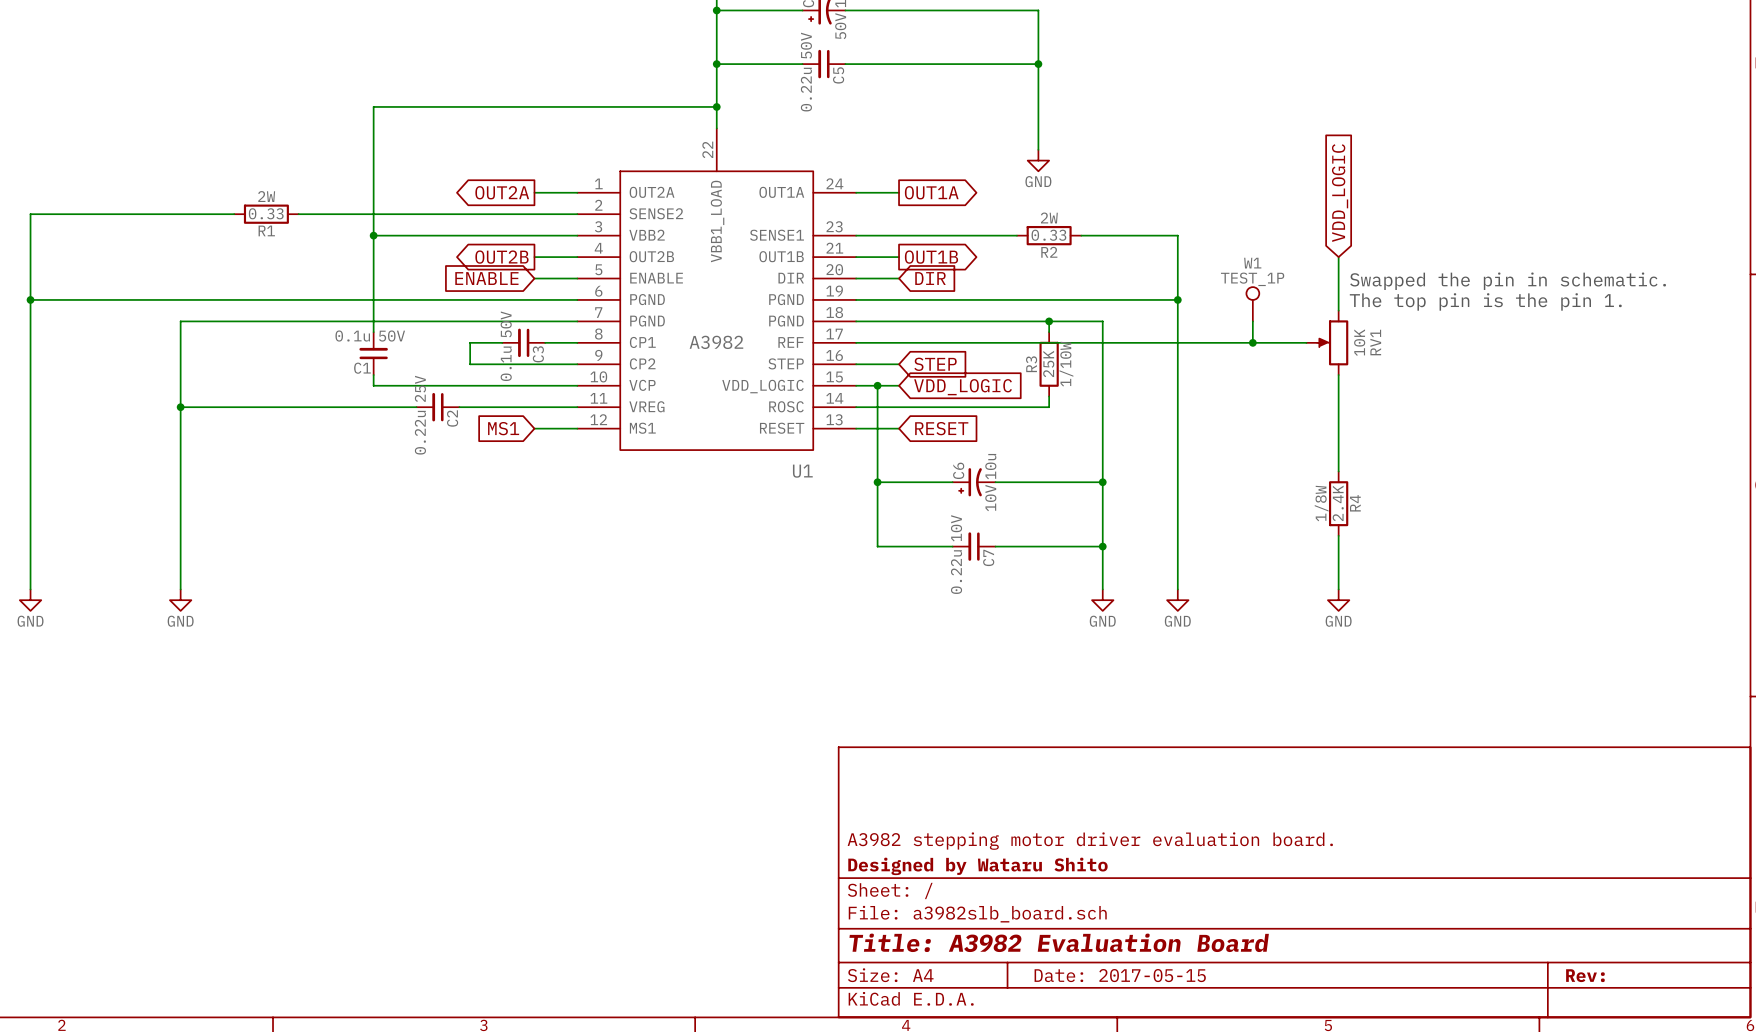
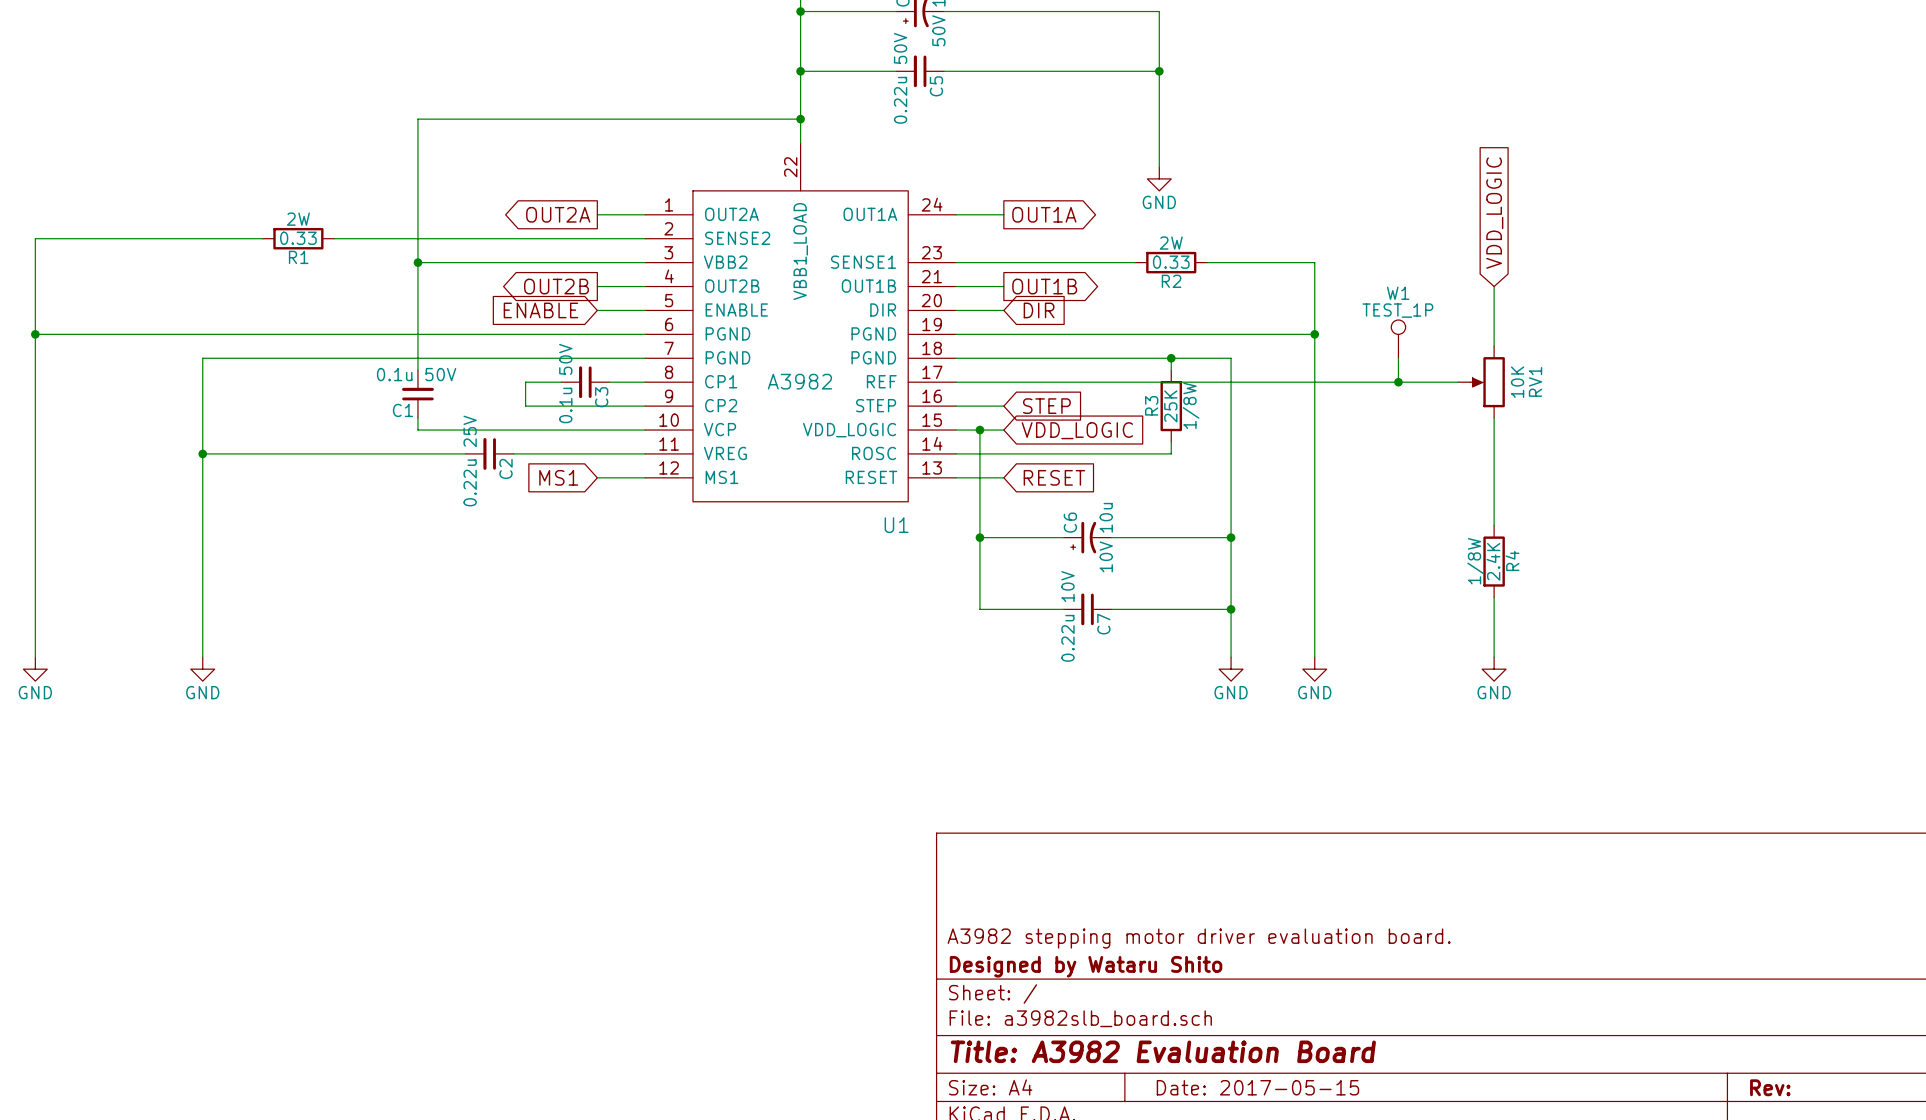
text: Swapped the pin in schematic. (1508, 281) -> none
text: The top pin is the pin 1. (1485, 301) -> none
RV1 flip: as is (1332, 342) -> up-down (1487, 382)
R3 text: 1/10W (1066, 364) -> 1/8W (1191, 405)

